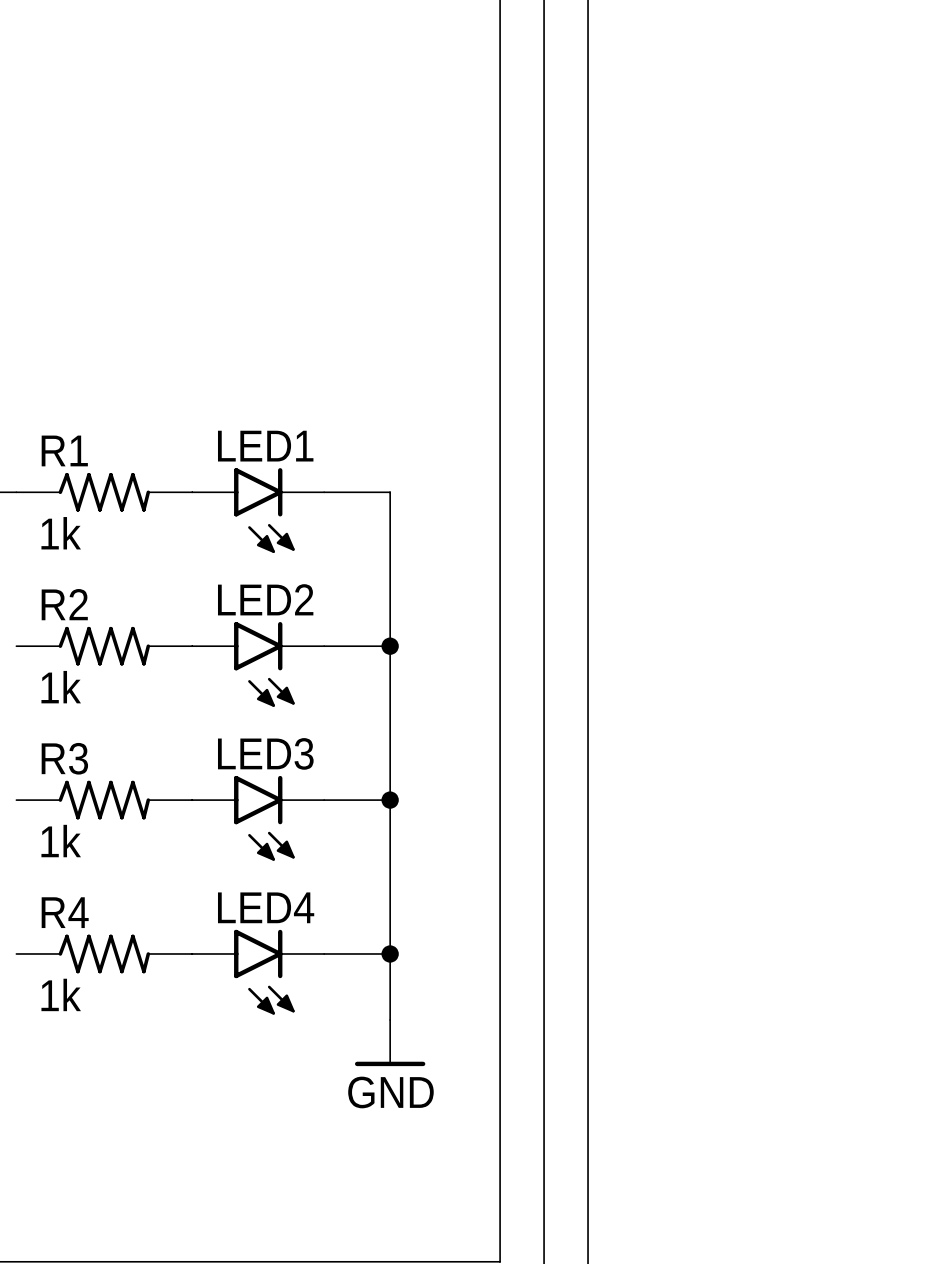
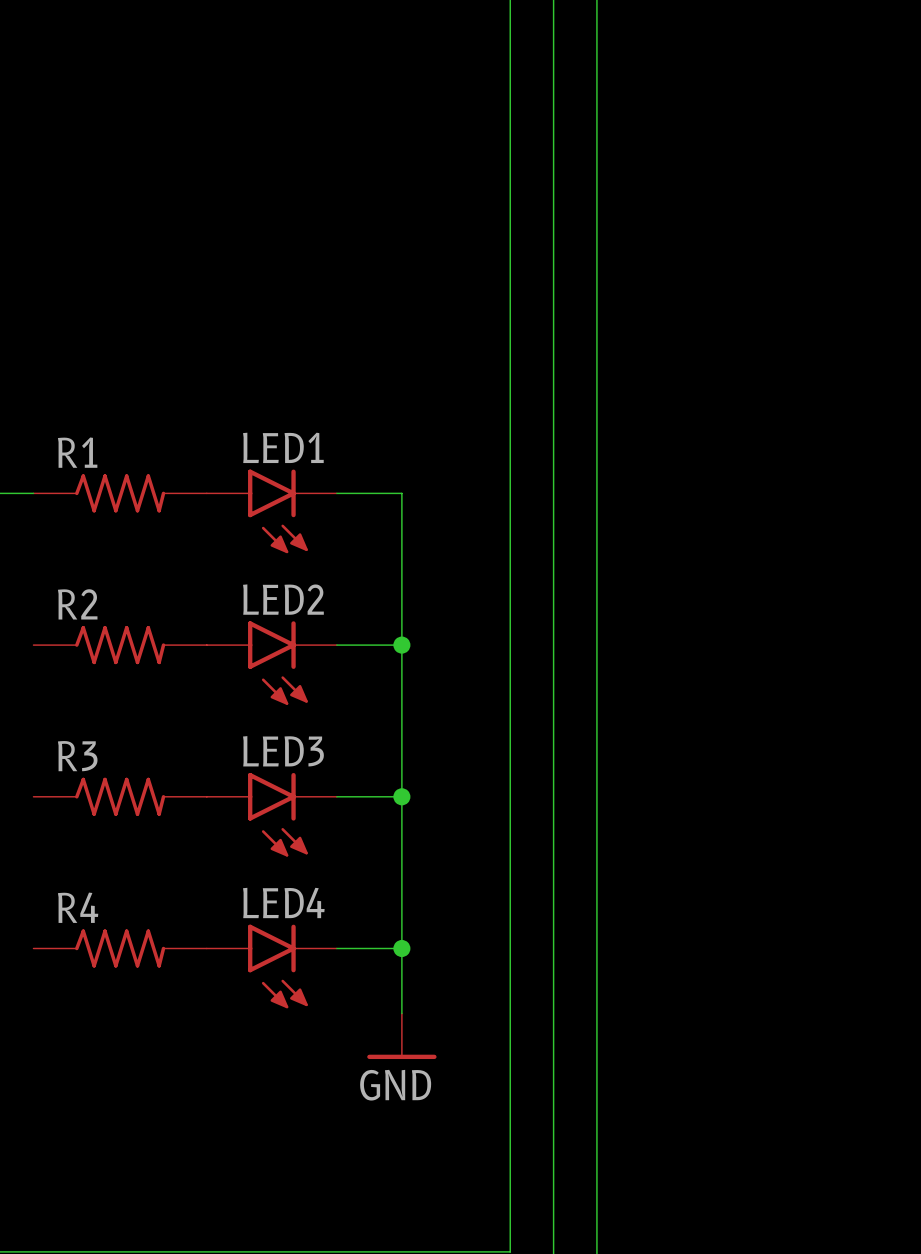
R1 value: 1k (61, 533) -> none
R2 value: 1k (61, 687) -> none
R3 value: 1k (61, 841) -> none
R4 value: 1k (61, 994) -> none

